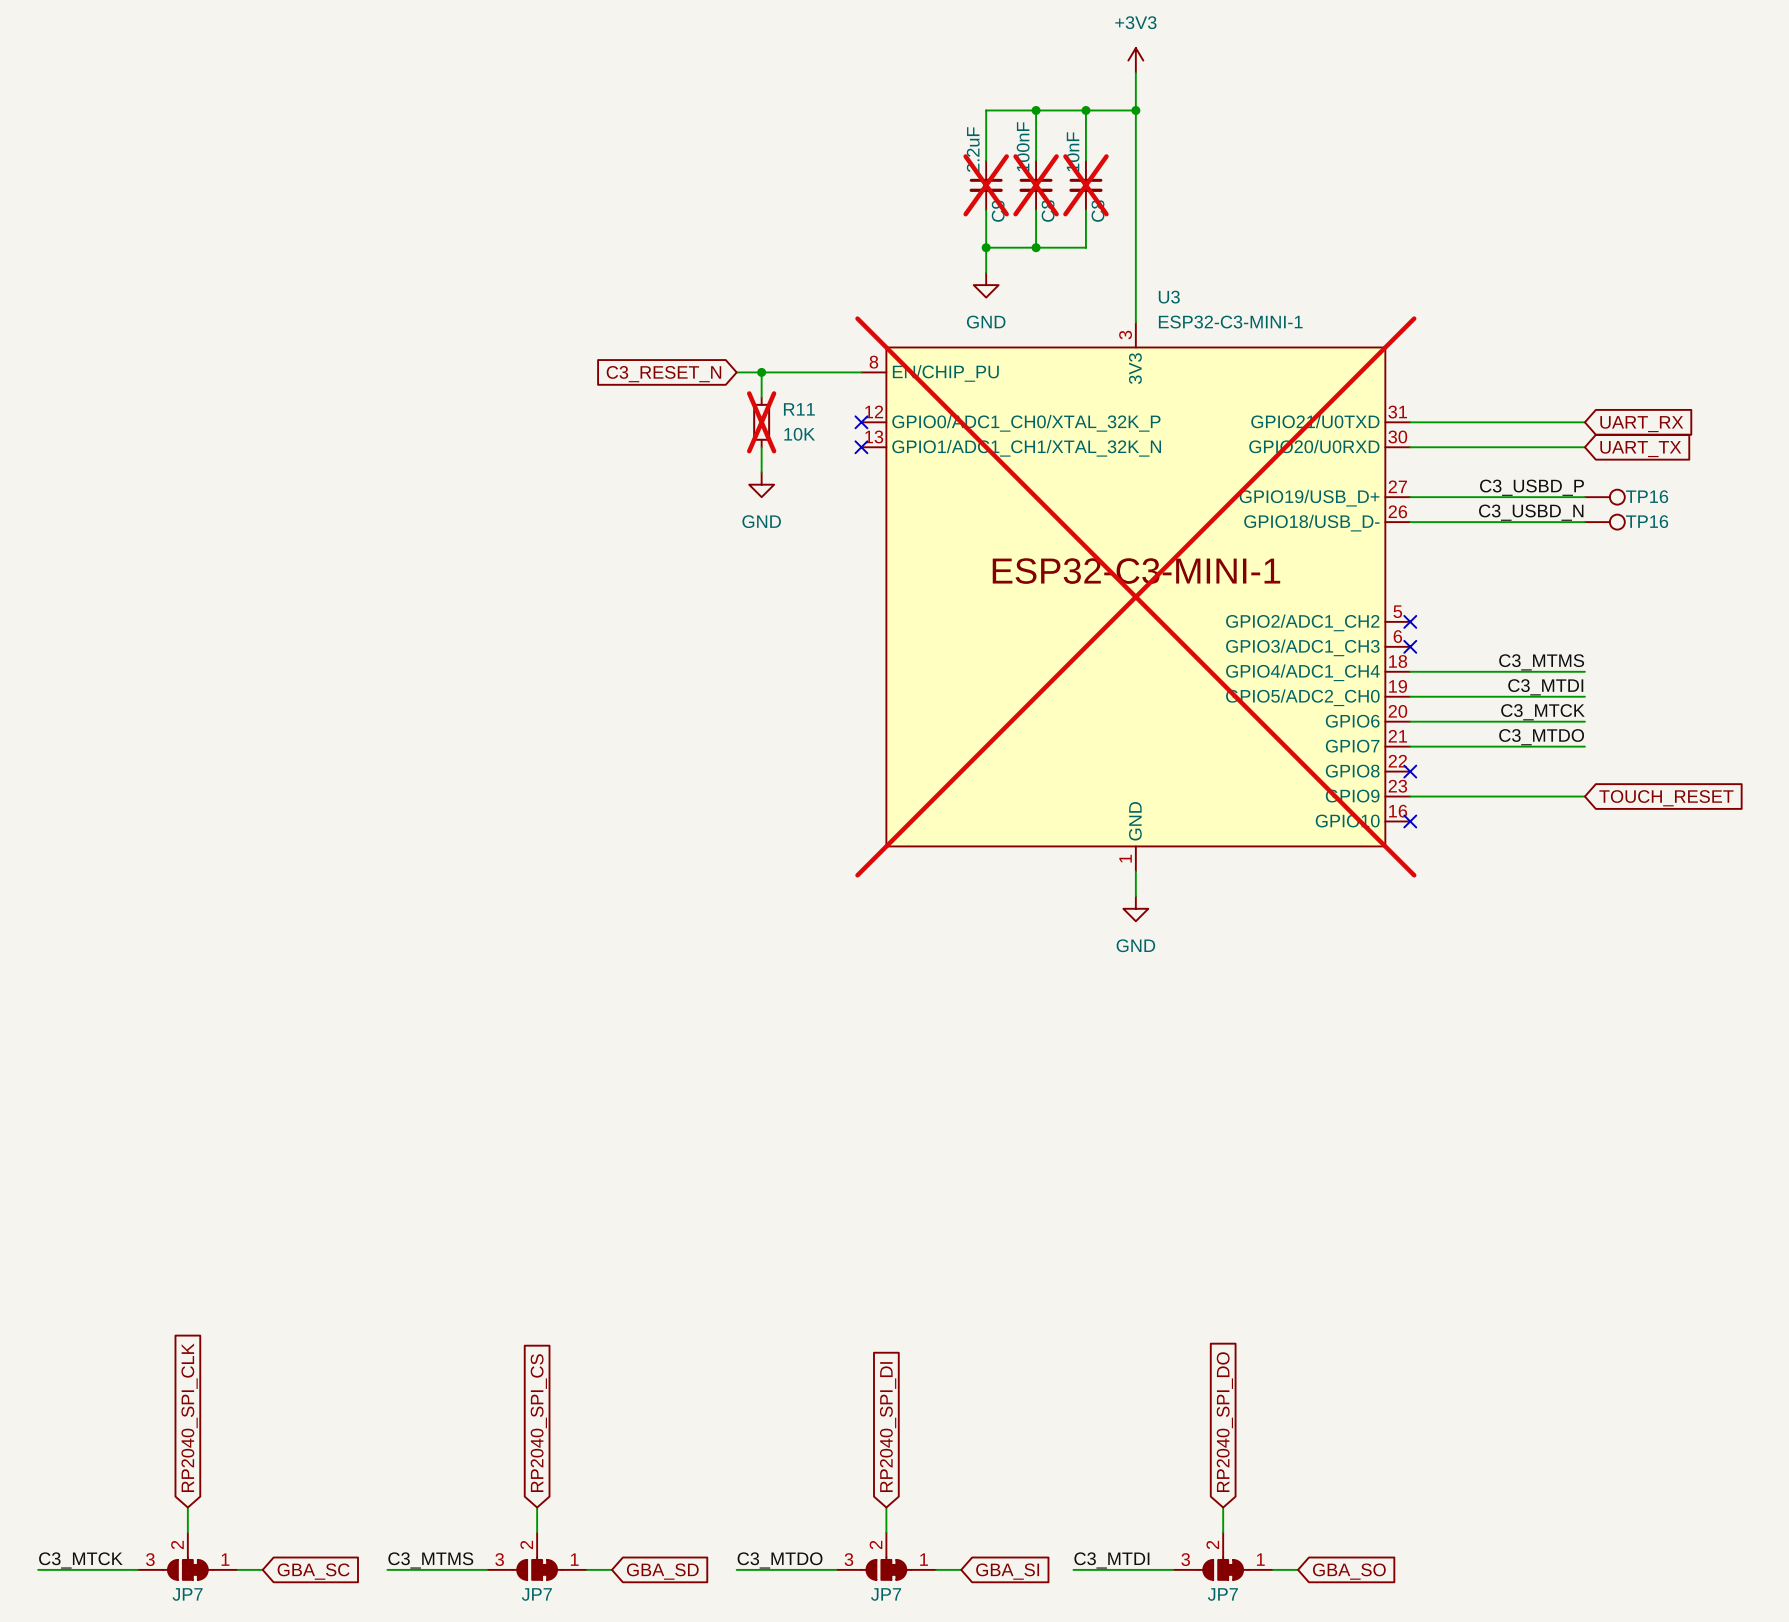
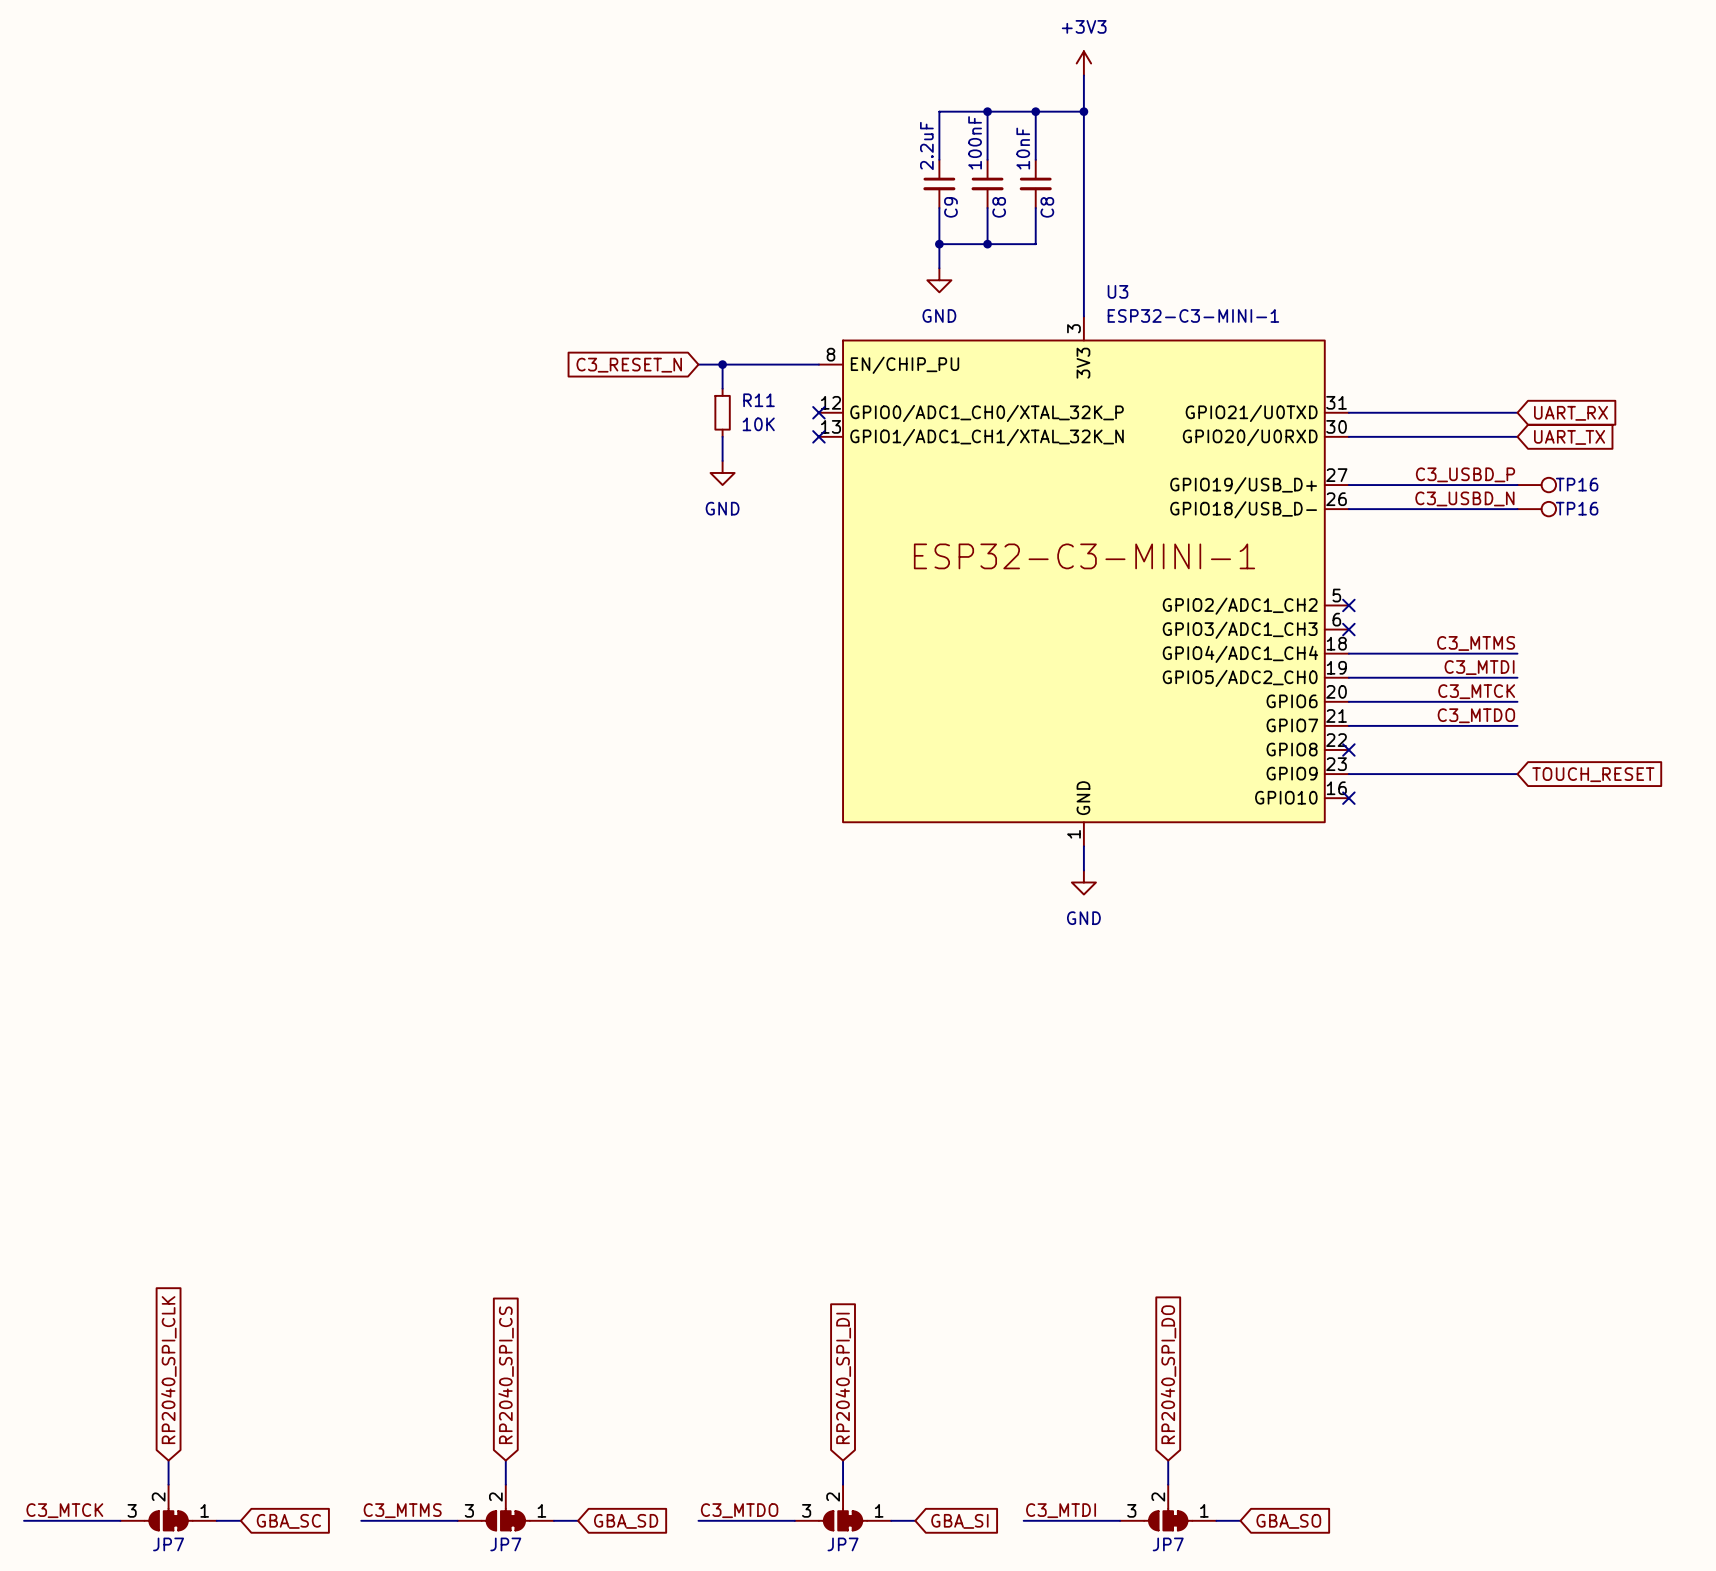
C9 do-not-place cross: (986, 185) -> none
C8 do-not-place cross: (1036, 185) -> none
C8 do-not-place cross: (1085, 185) -> none
R11 do-not-place cross: (761, 422) -> none
U3 do-not-place cross: (1135, 596) -> none

